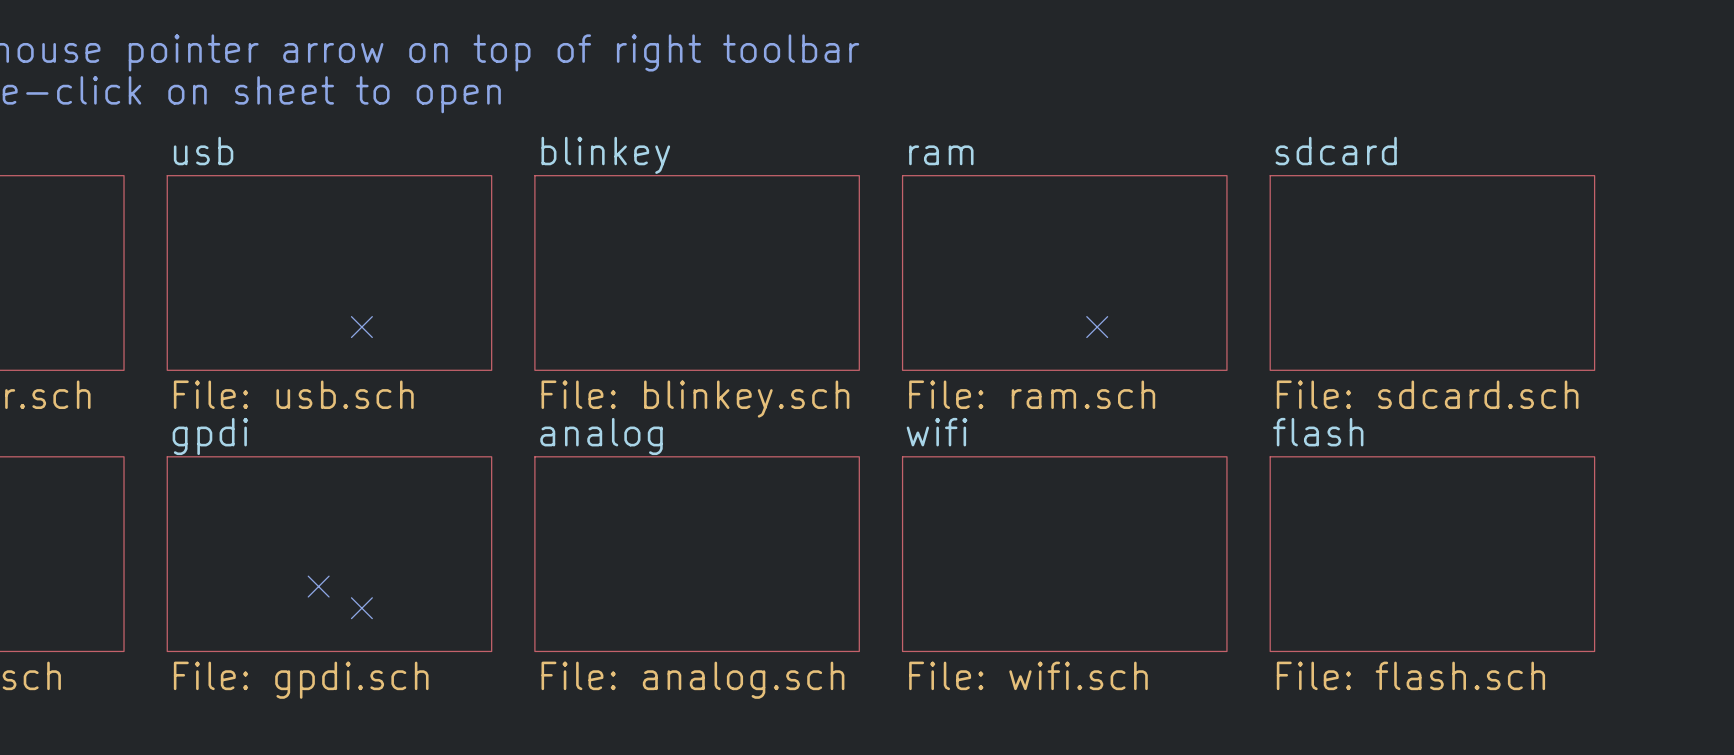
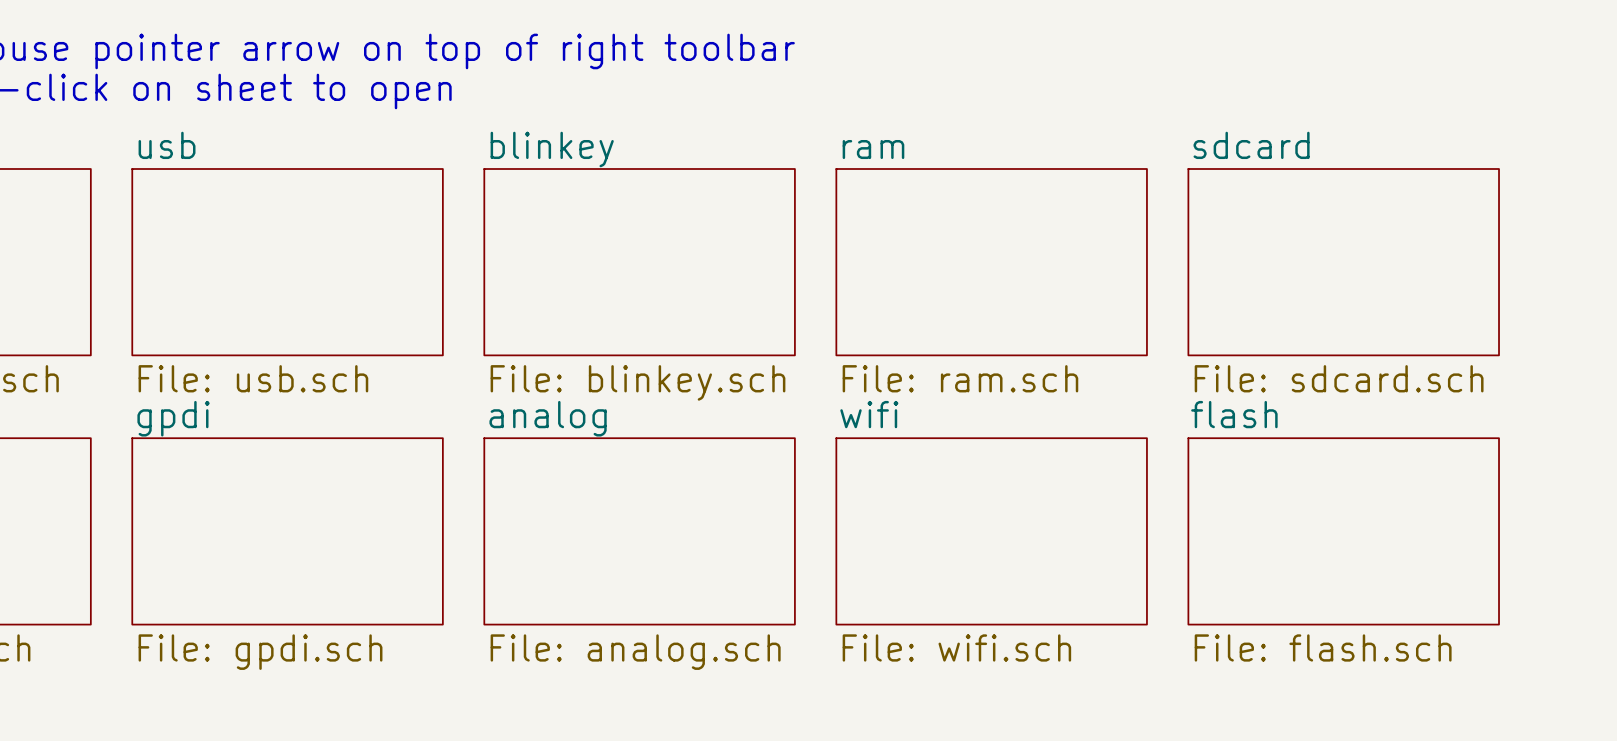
no-connect mark: (361, 327) -> none
no-connect mark: (1097, 327) -> none
no-connect mark: (318, 586) -> none
no-connect mark: (361, 608) -> none

